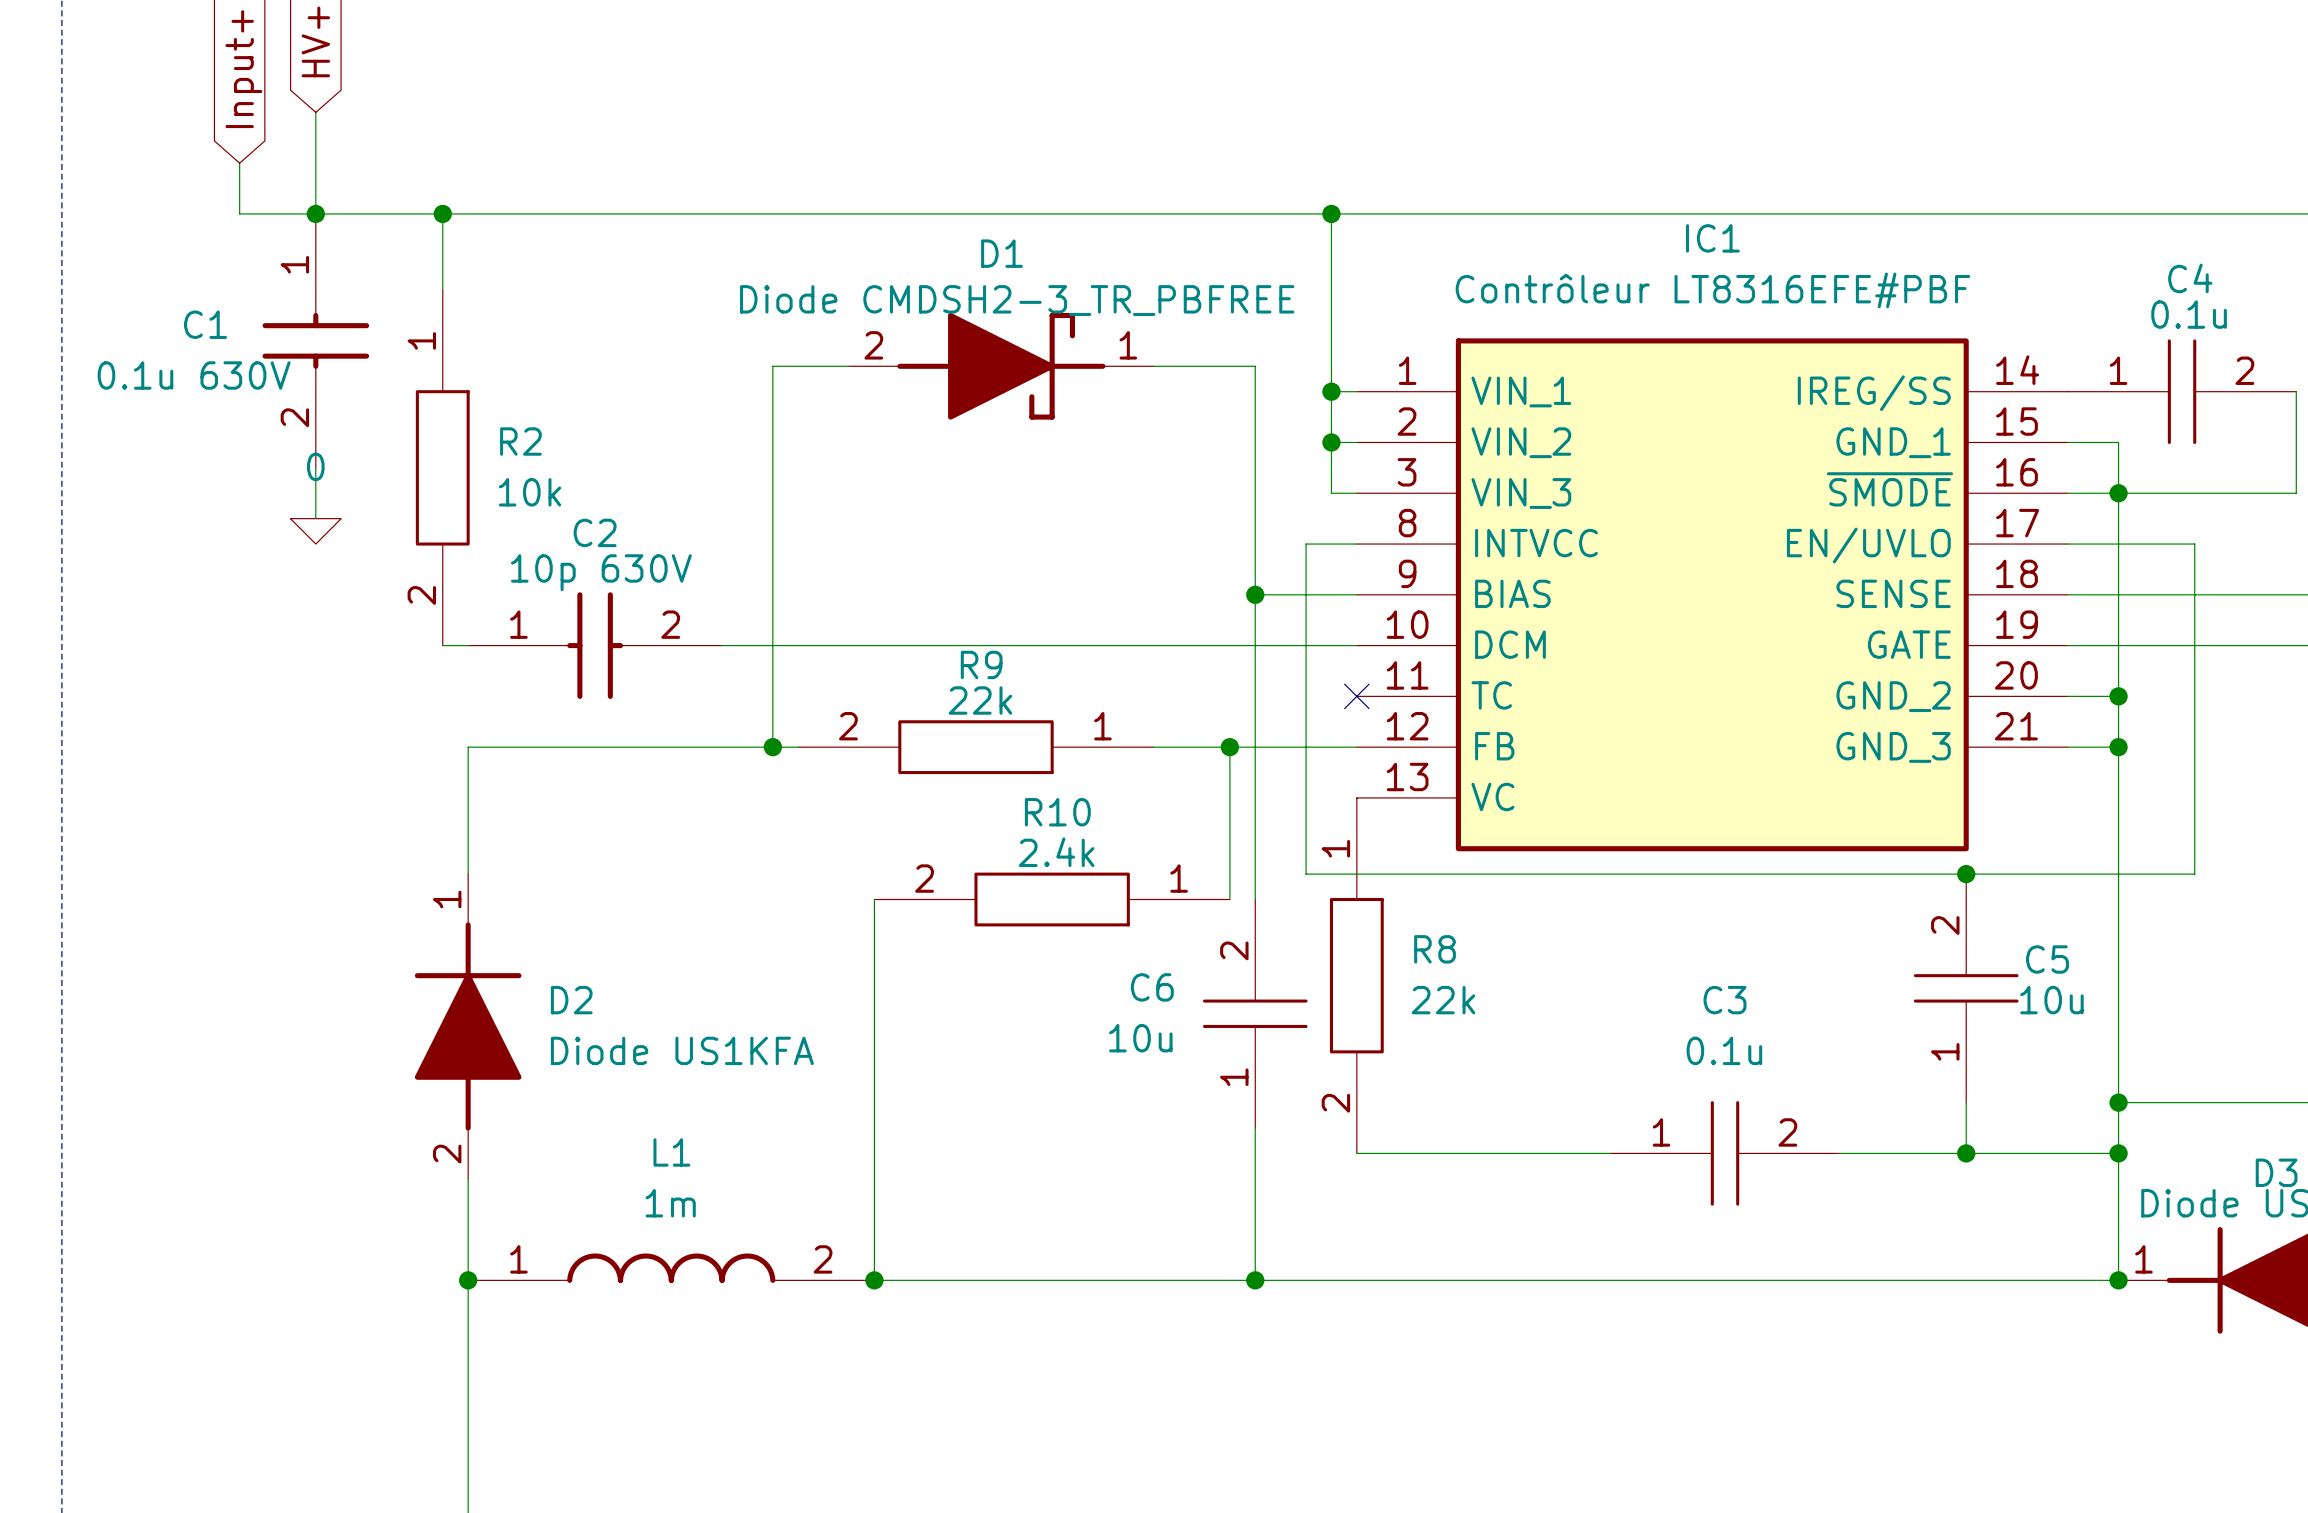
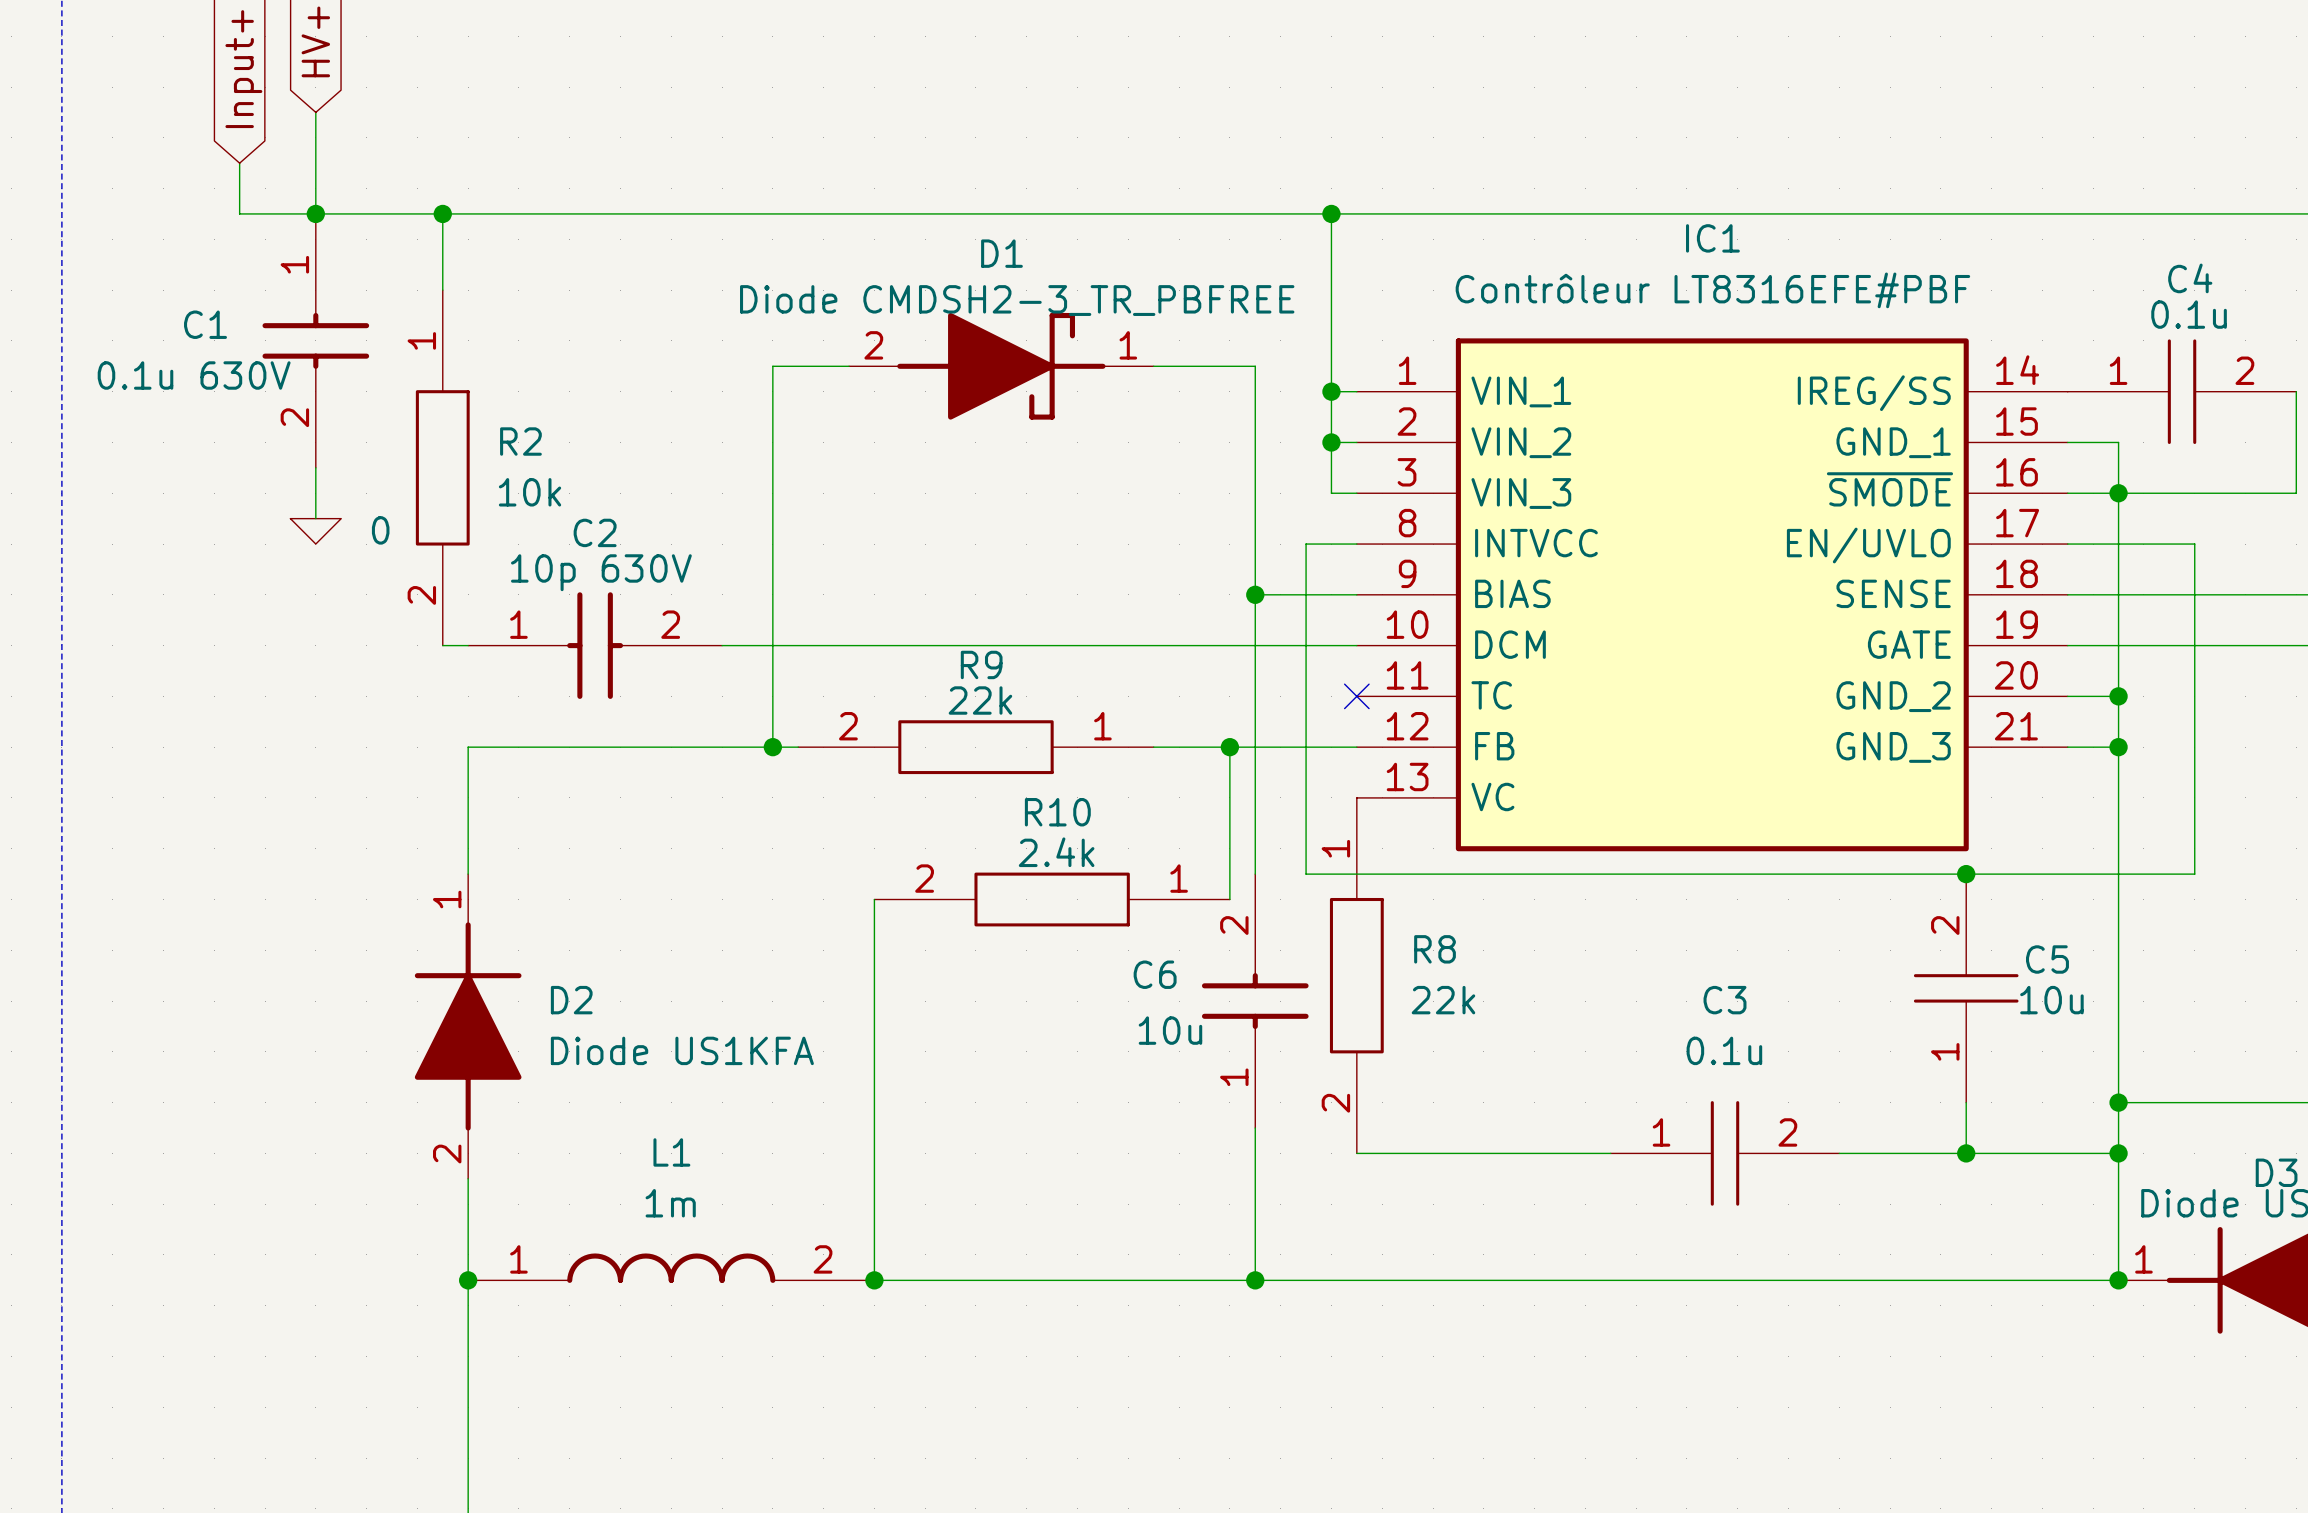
power symbol text position: 0 (315, 466) -> 0 (380, 530)
C6 symbol: [1202, 899, 1308, 1129] -> [1201, 874, 1309, 1129]
C6 value position: 10u (1140, 1038) -> 10u (1170, 1030)

